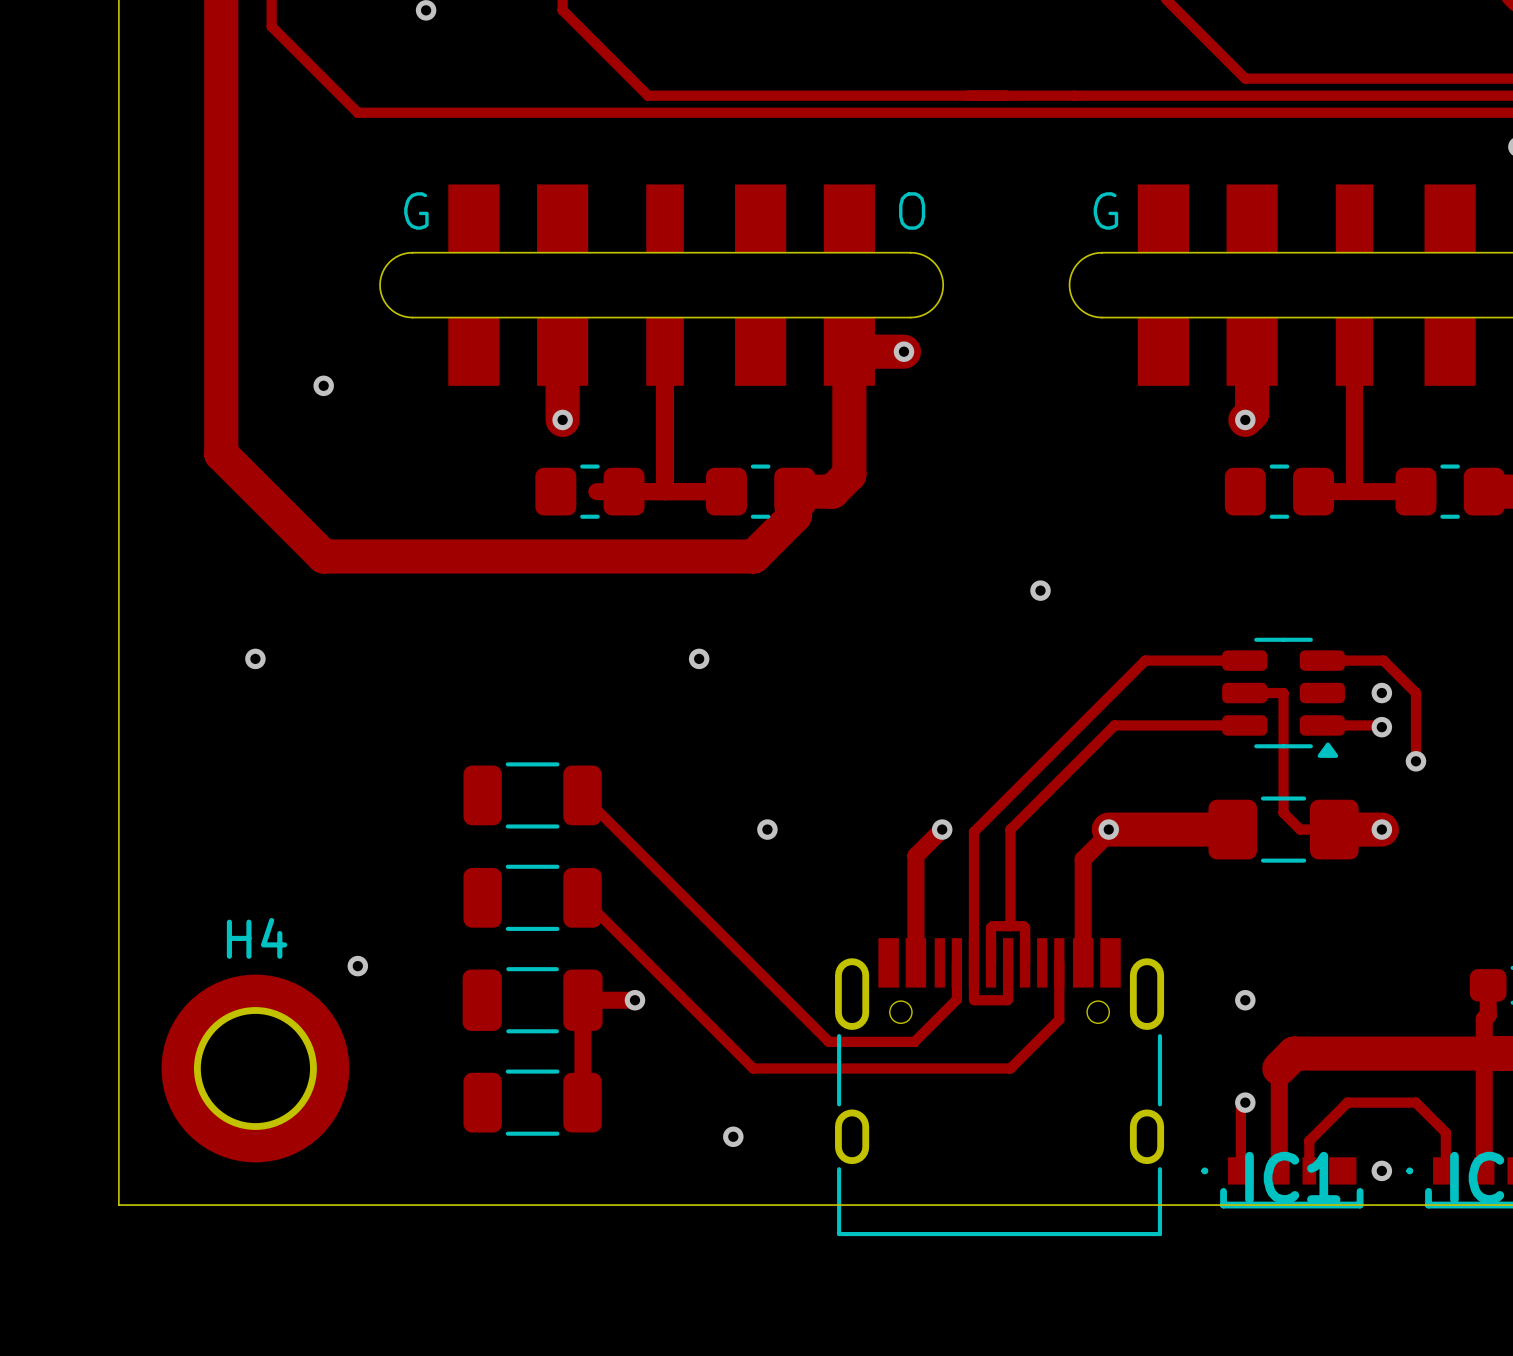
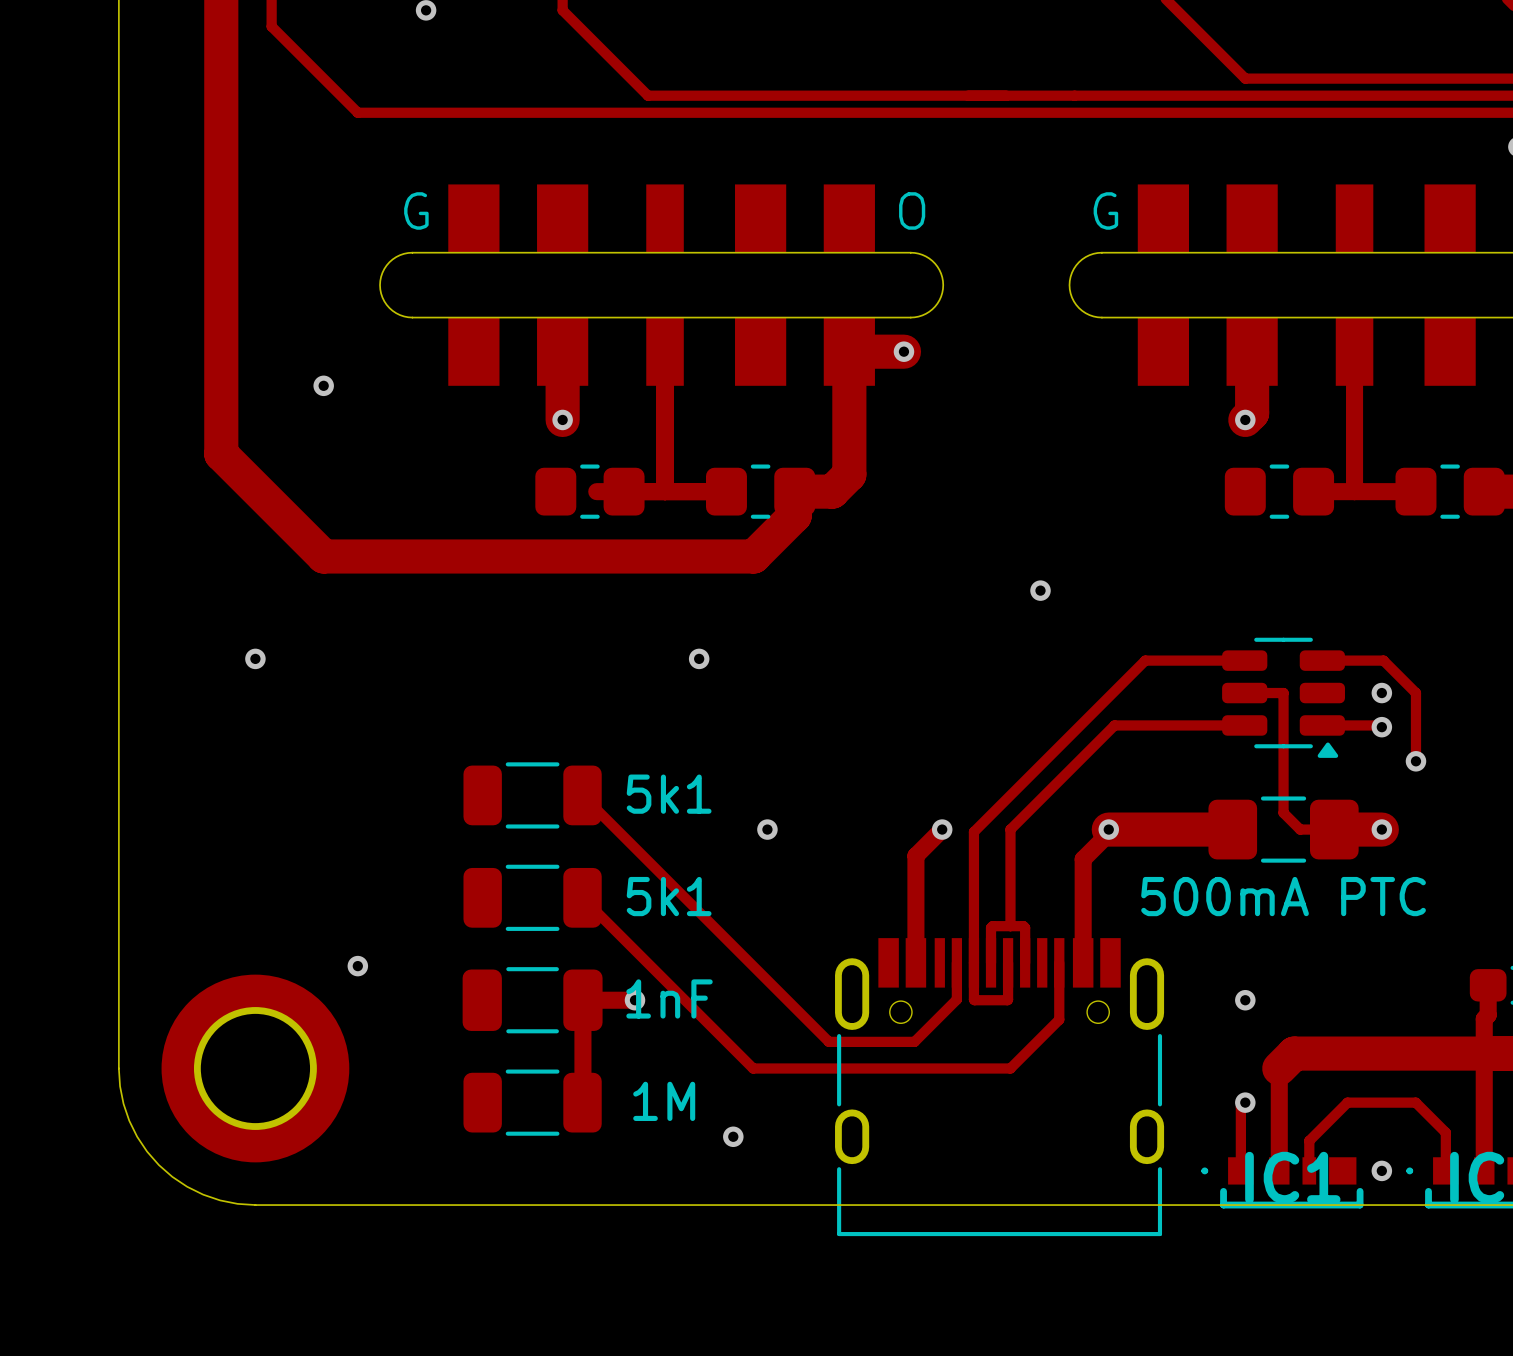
part value: none -> 5k1 (669, 794)
part value: none -> 5k1 (669, 896)
part value: none -> 500mA PTC (1283, 896)
H4 name: H4 (257, 938) -> none
part value: none -> 1nF (669, 998)
board edge: (118, 1068) (118, 1205) (255, 1205) -> (118, 1068) (123, 1103) (129, 1120) (137, 1136) (158, 1165) (172, 1176) (203, 1194) (237, 1203) (255, 1205)
part value: none -> 1M (664, 1101)

